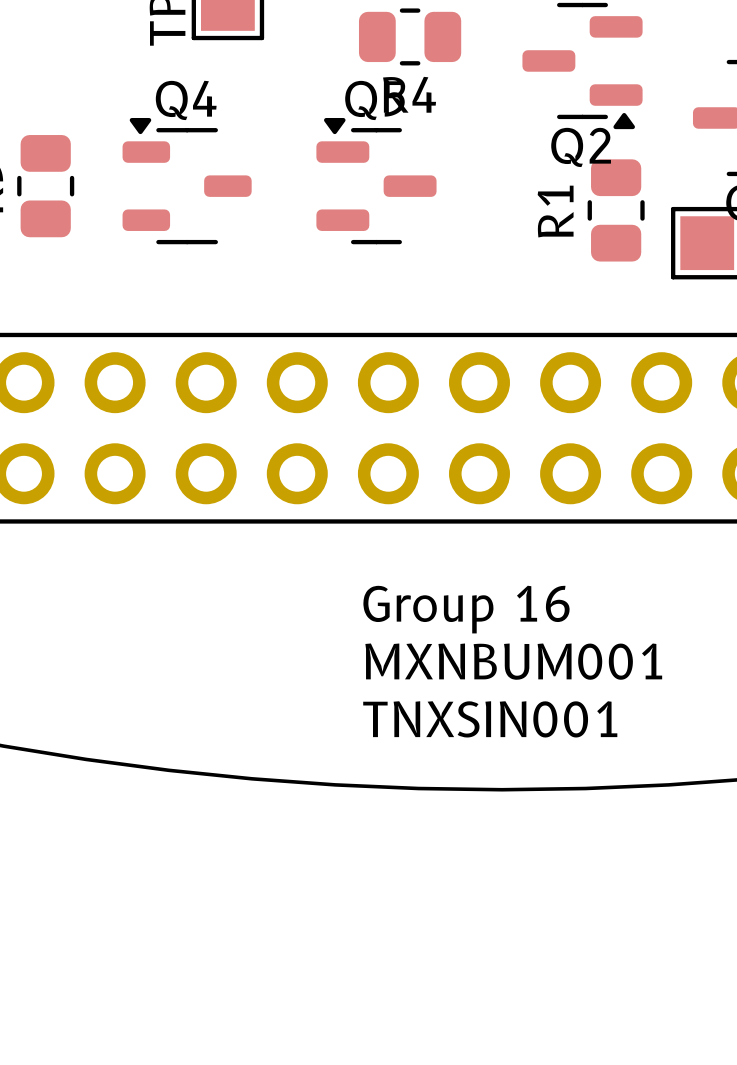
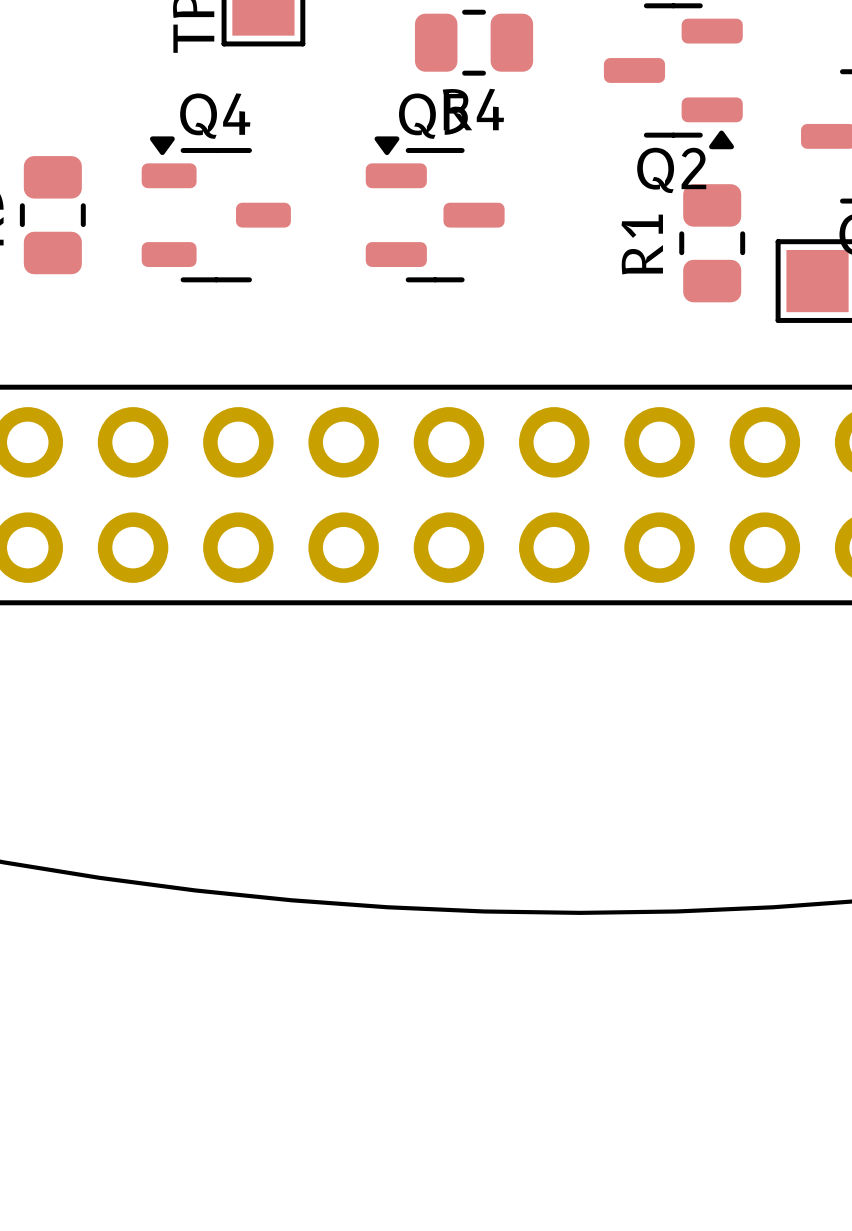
text: Group 16 (466, 609) -> none
text: MXNBUM001 (513, 661) -> none
text: TNXSIN001 (490, 719) -> none

